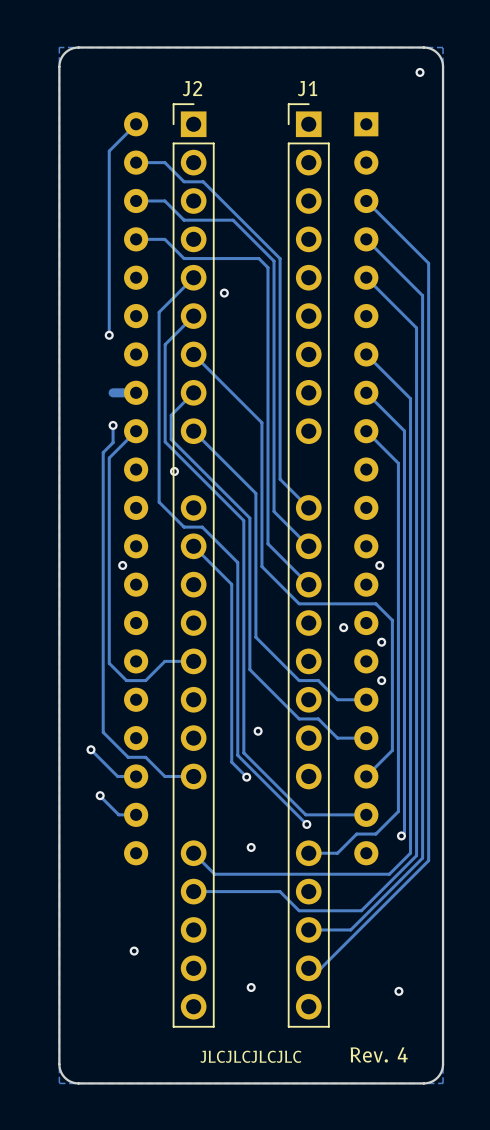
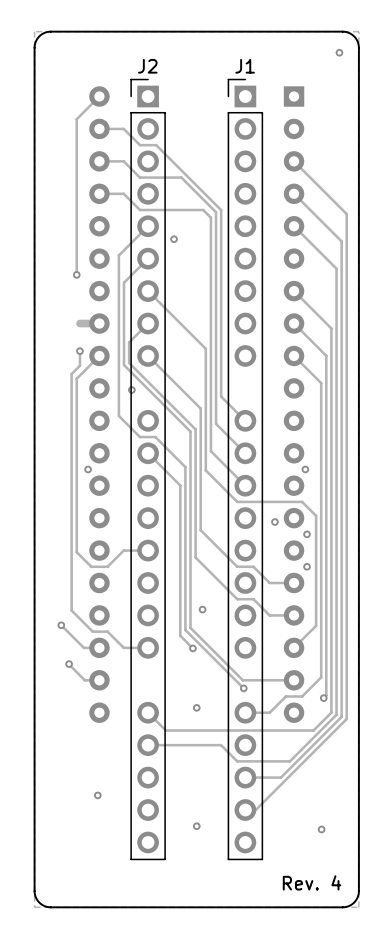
text: JLCJLCJLCJLC (250, 1056) -> none

